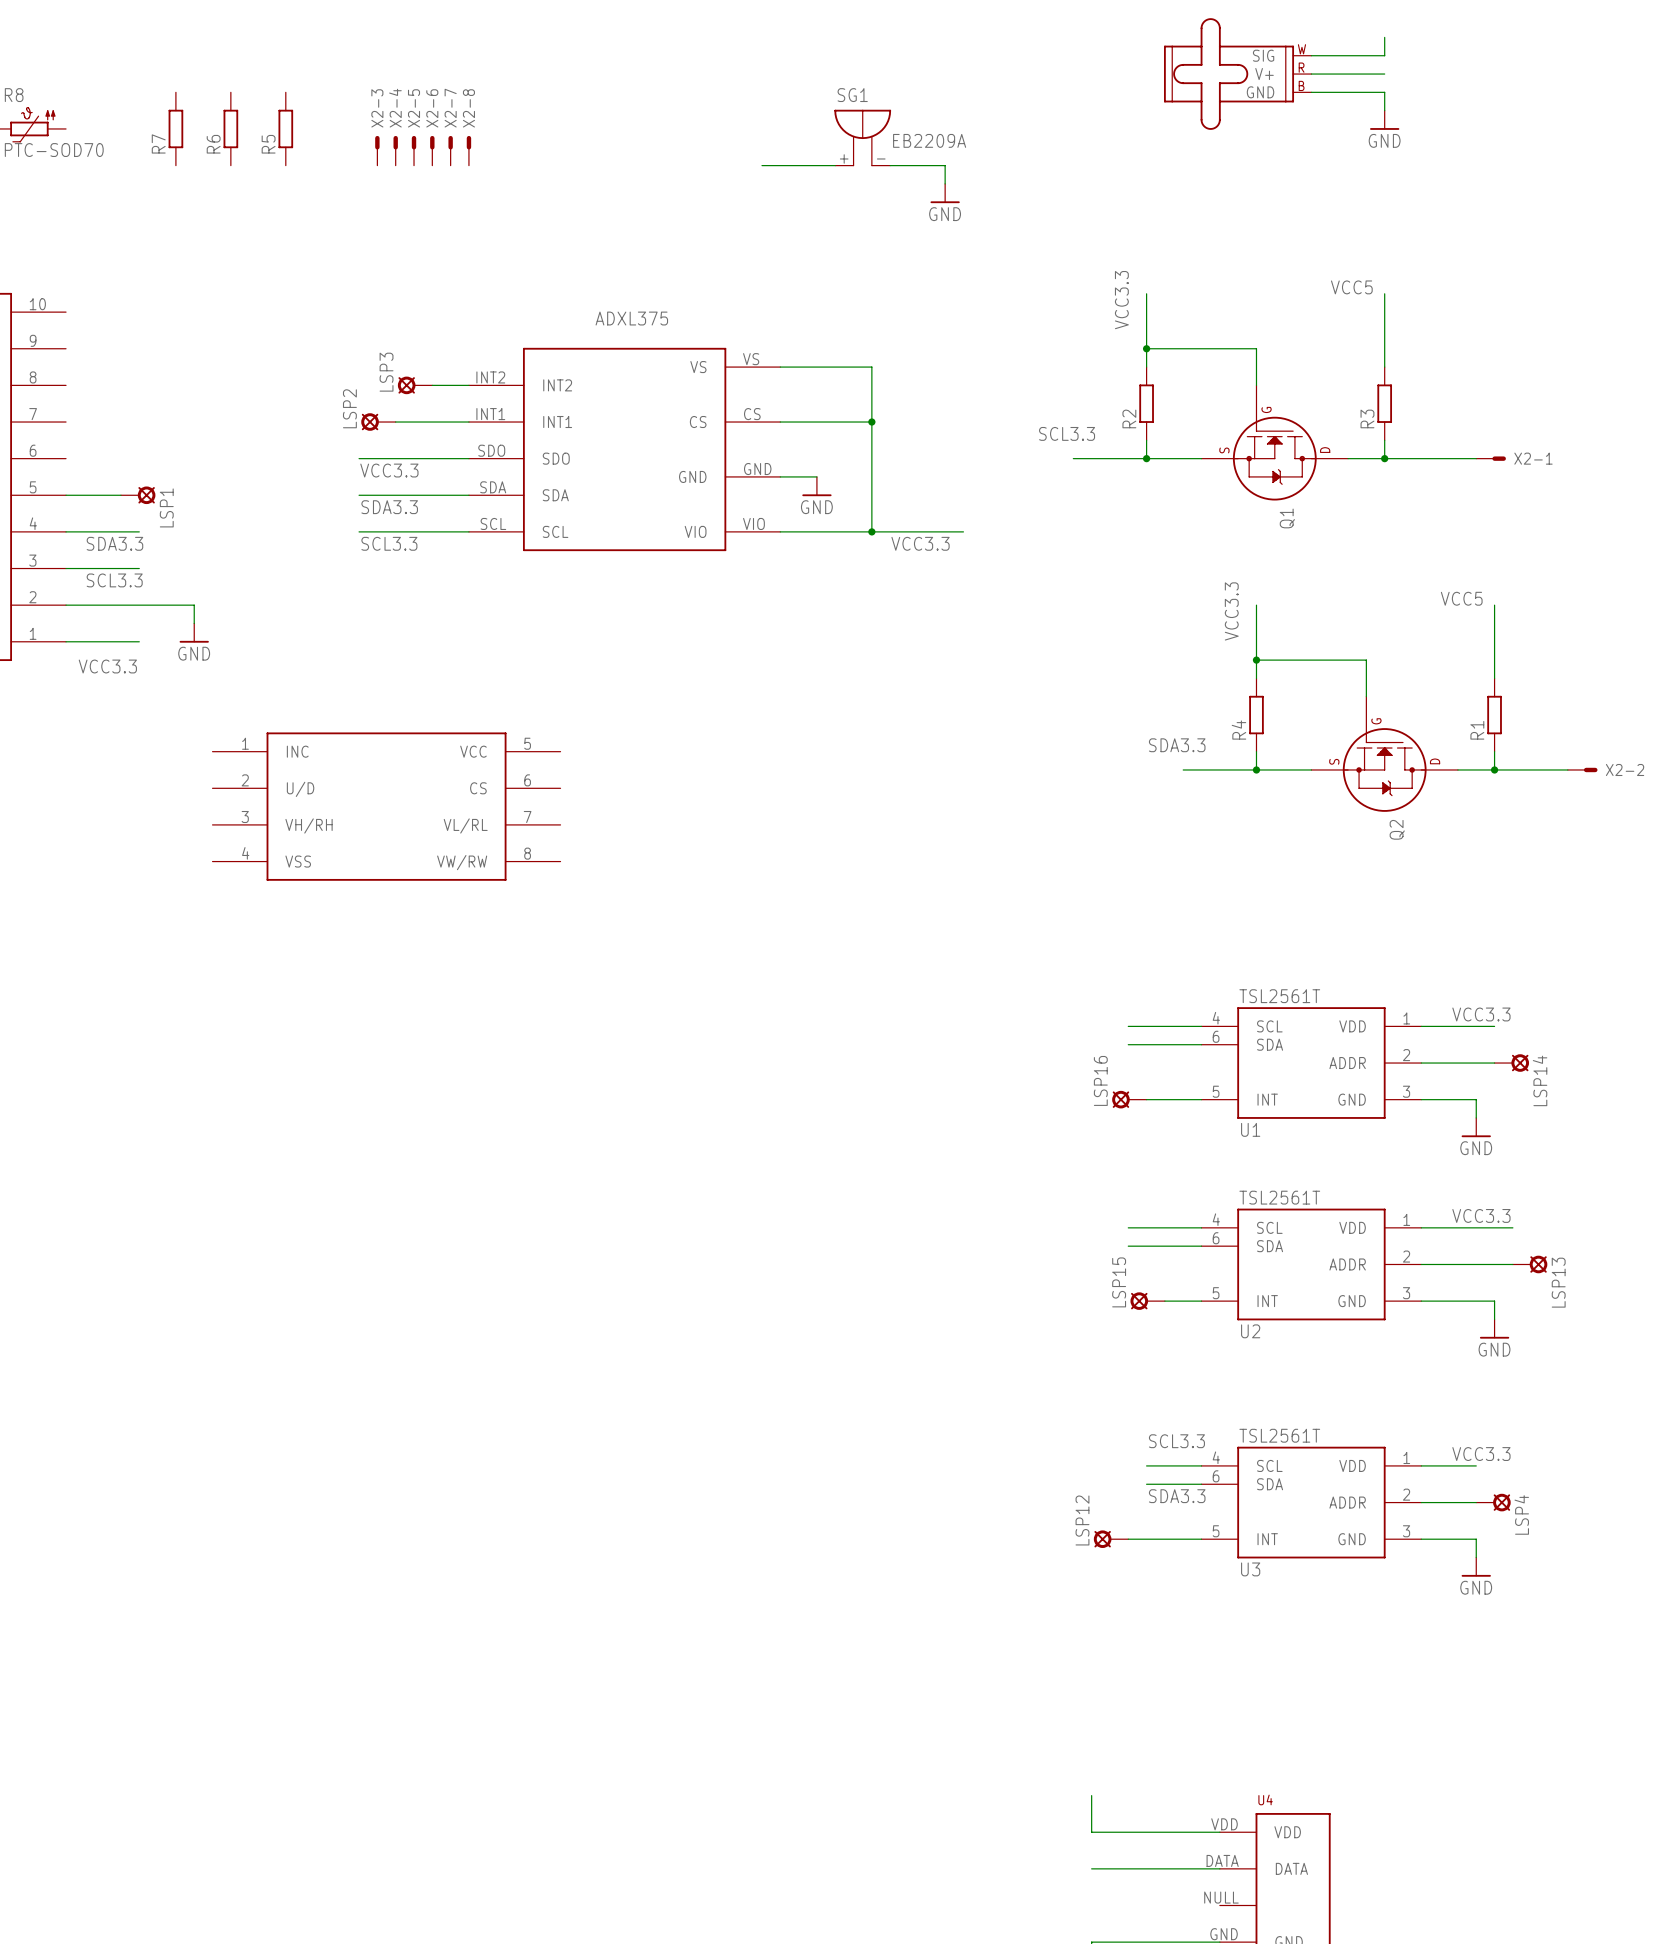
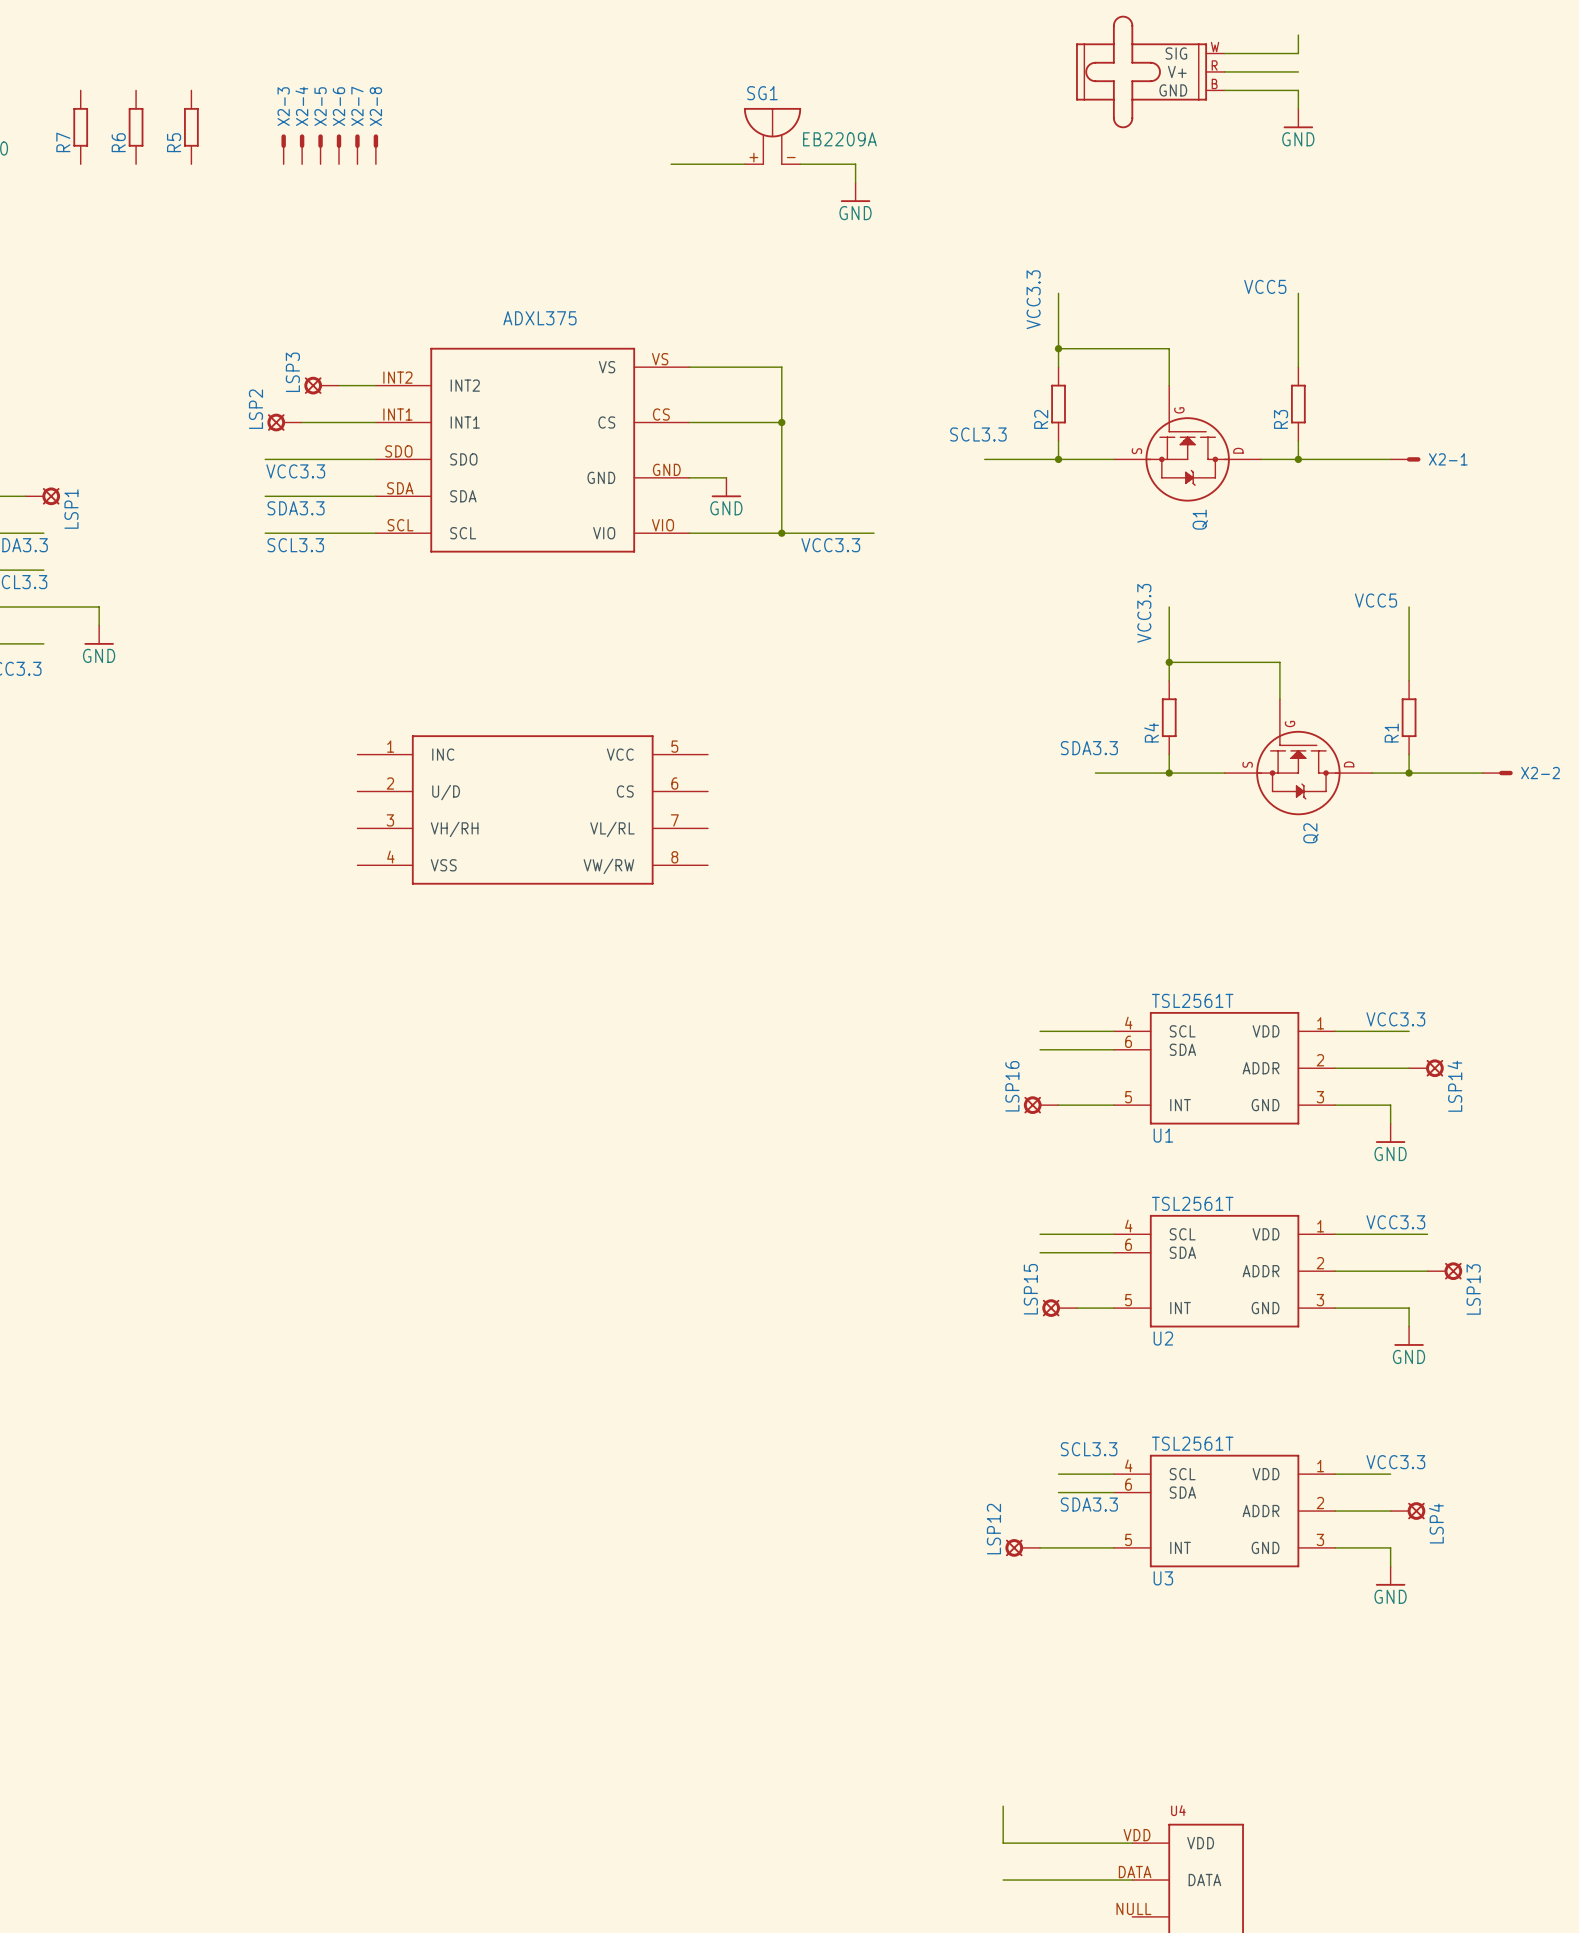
part: (386, 806) -> none
part: none -> (532, 809)

